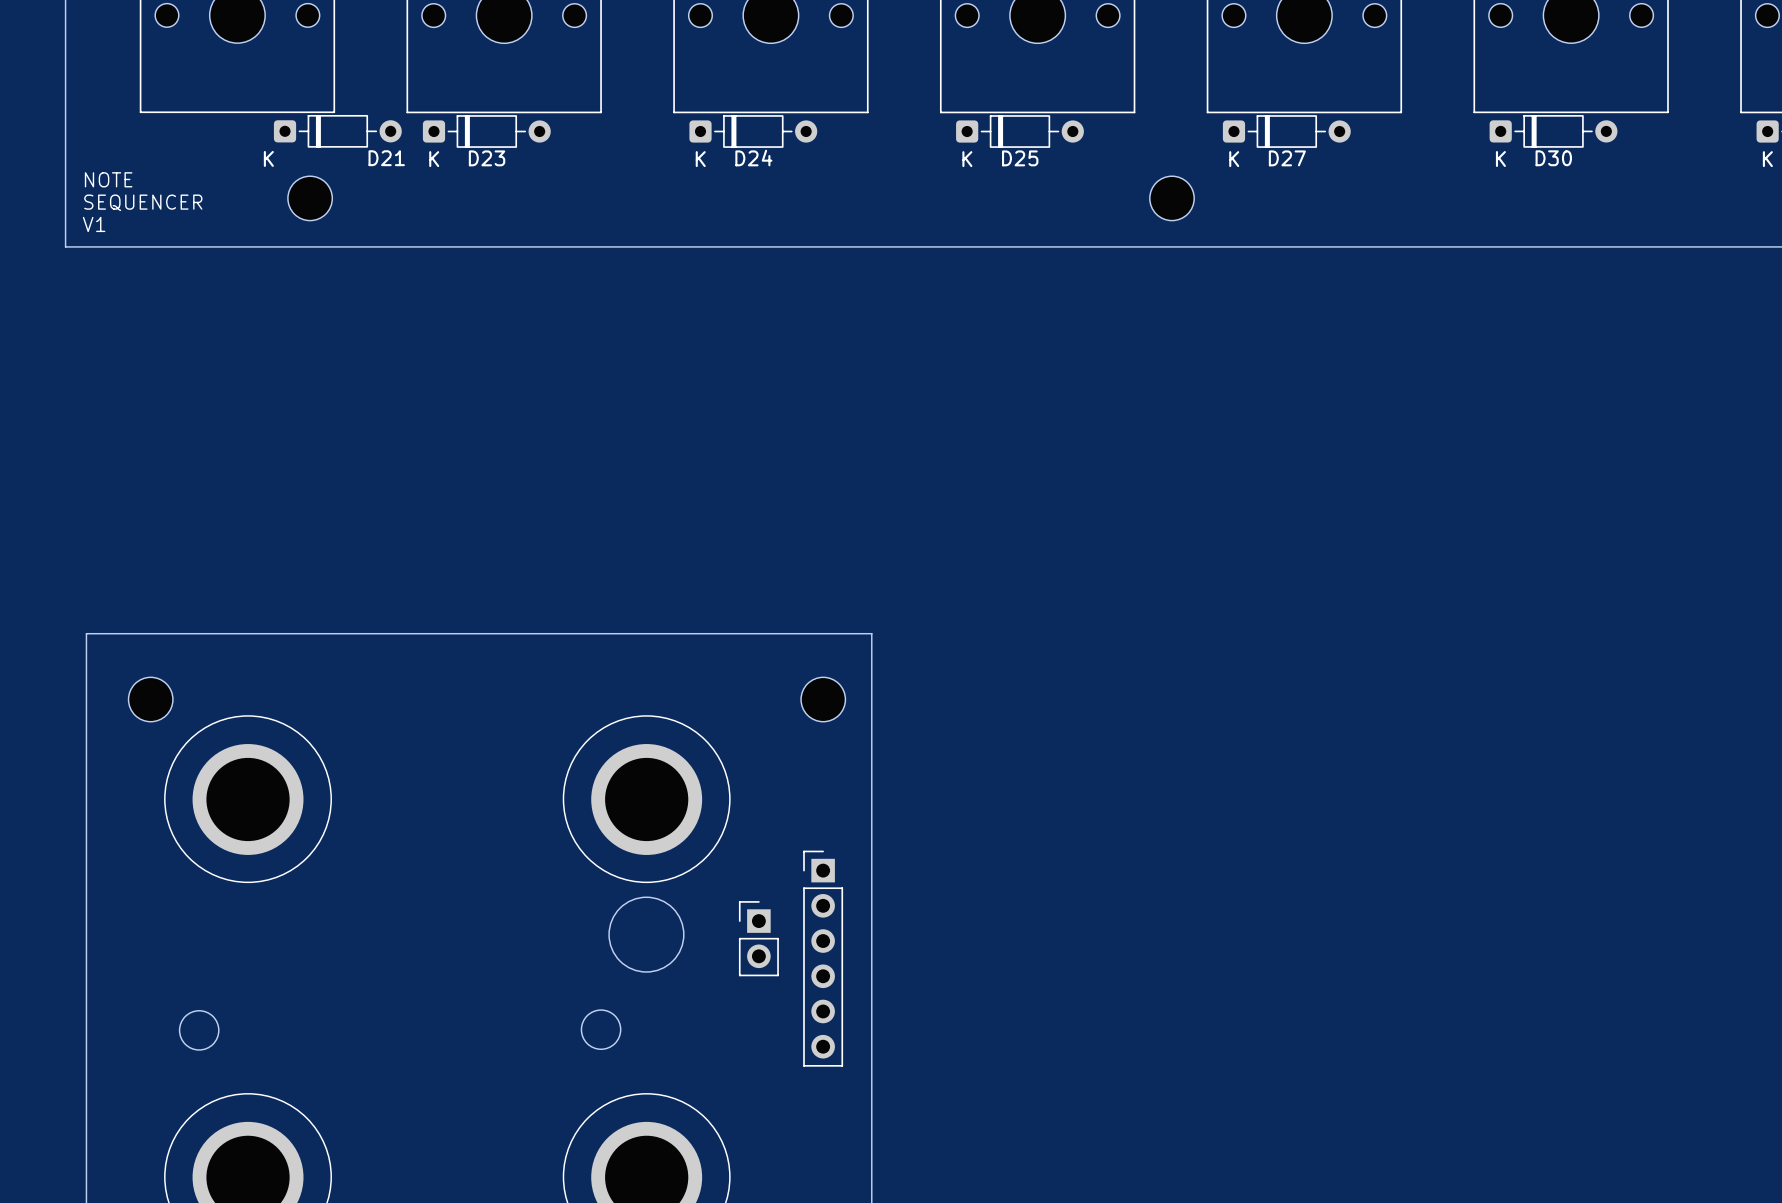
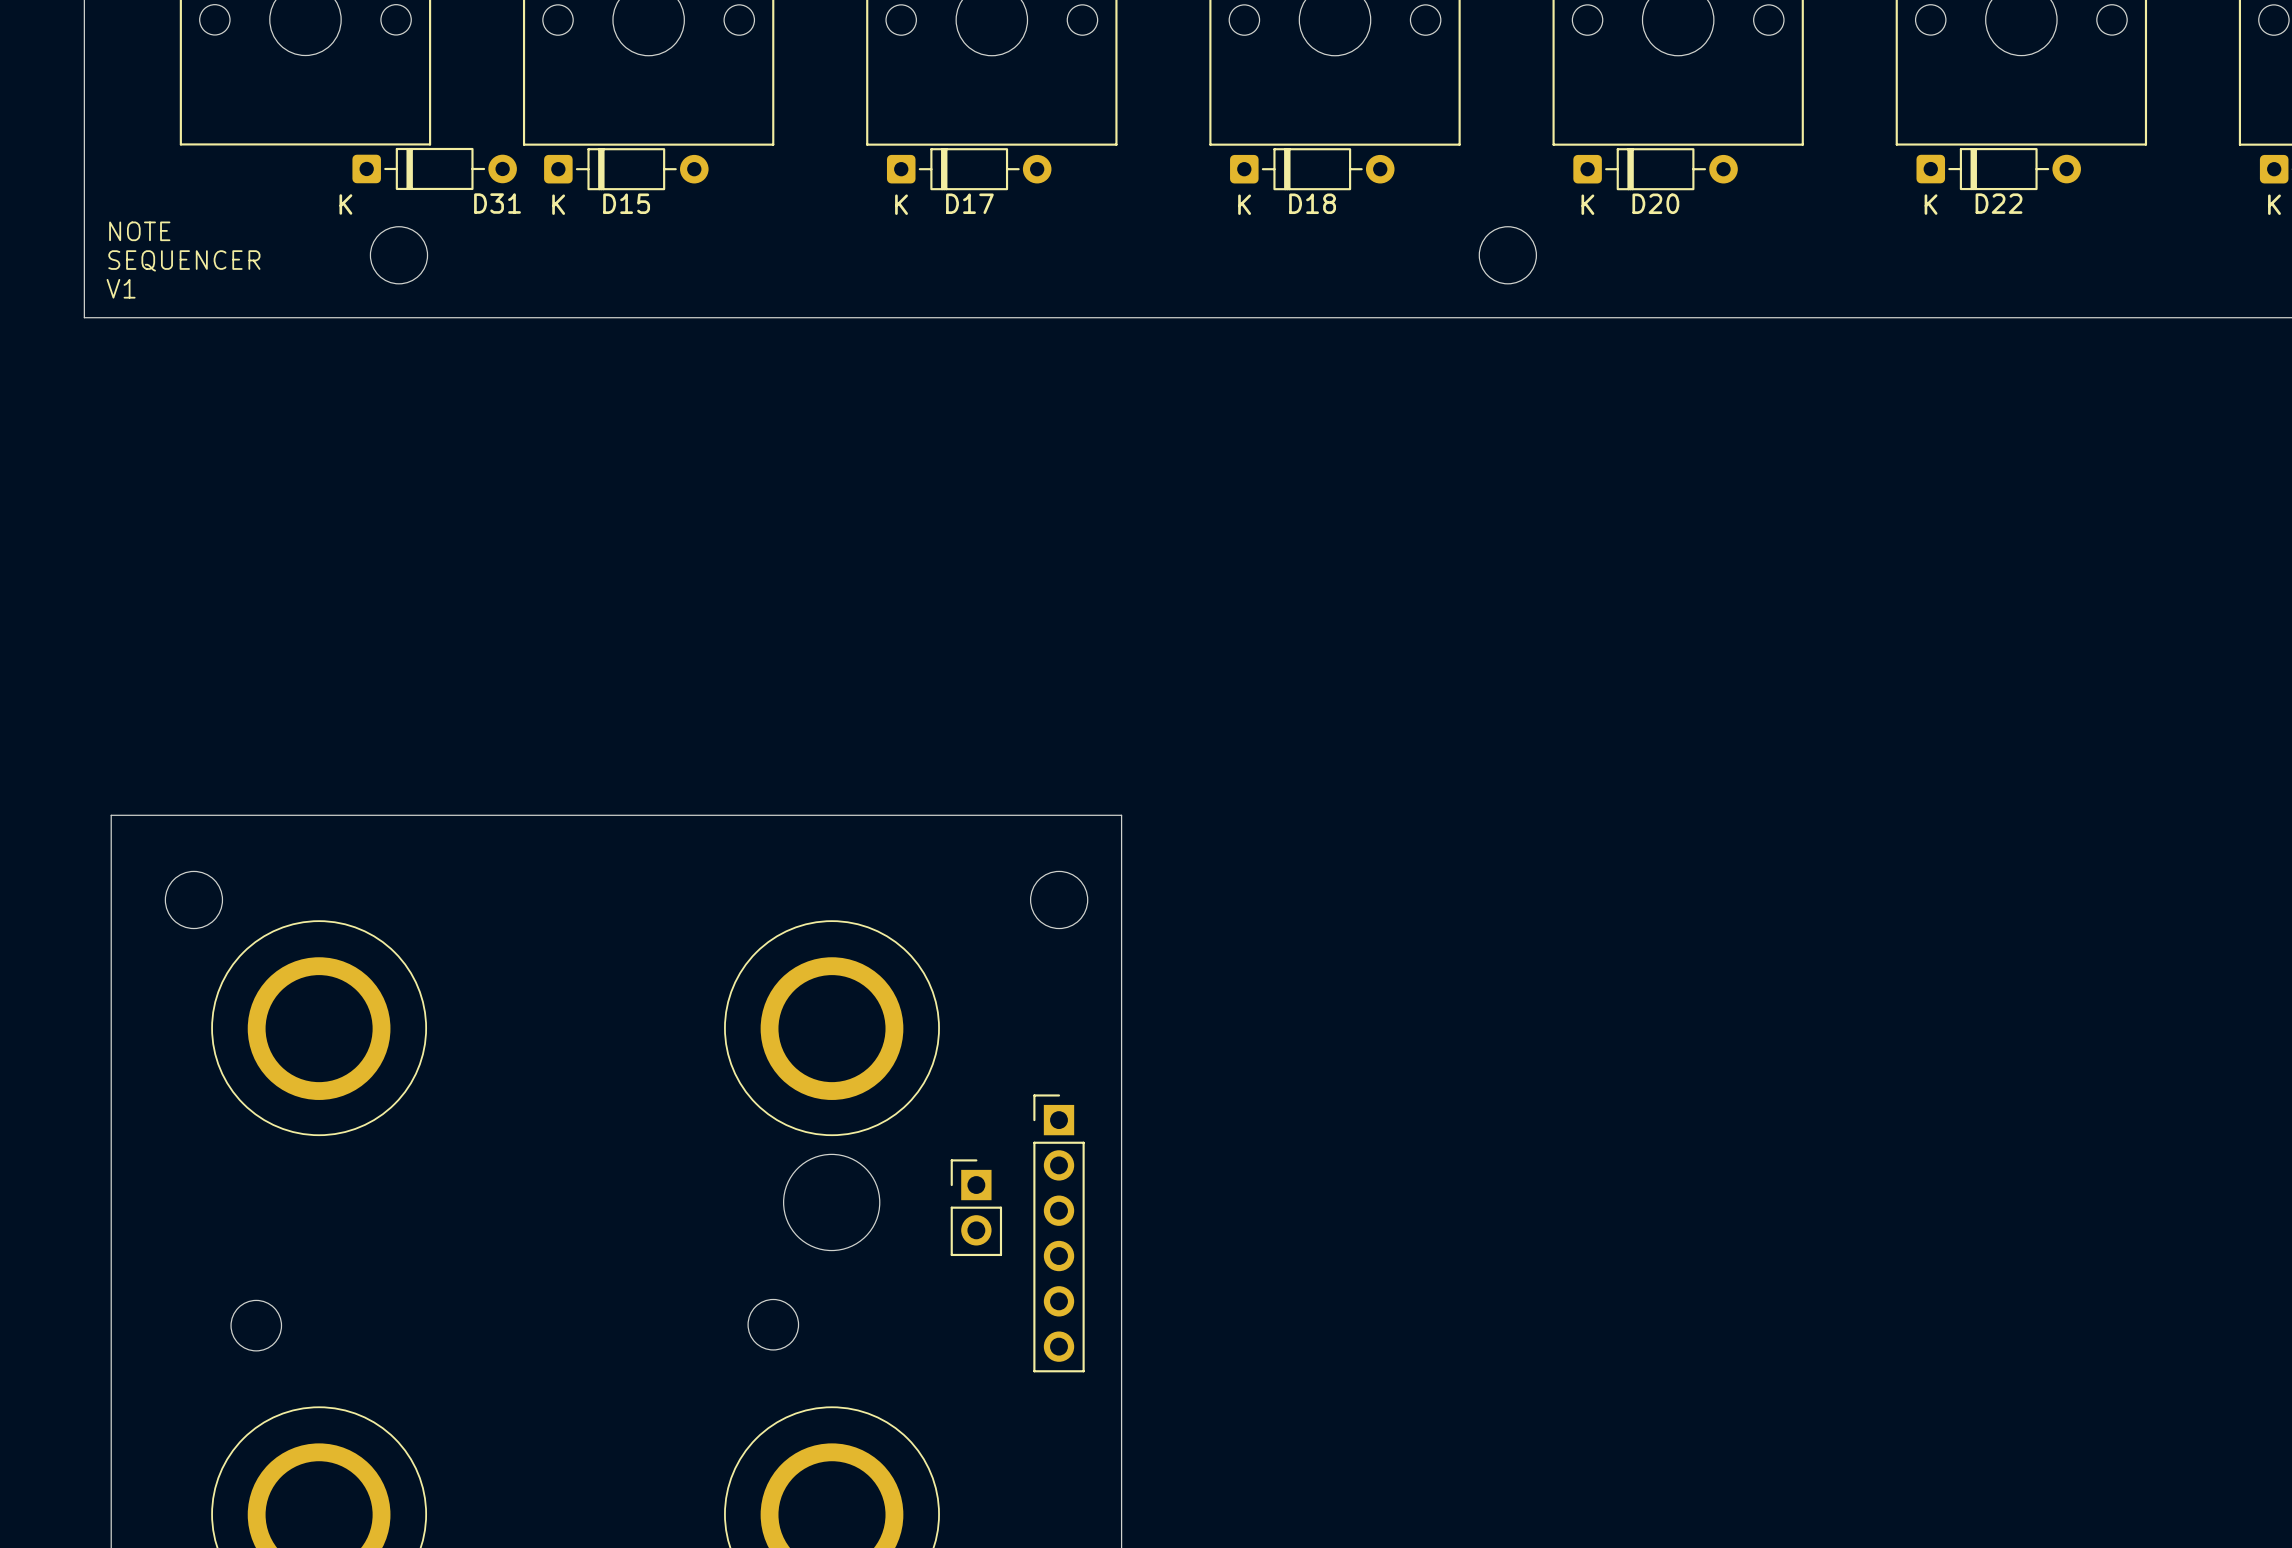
D21 name: D21 (386, 158) -> D31 (497, 203)
D23 name: D23 (487, 158) -> D15 (626, 203)
D24 name: D24 (753, 158) -> D17 (969, 203)
D25 name: D25 (1020, 158) -> D18 (1312, 203)
D27 name: D27 (1287, 158) -> D20 (1655, 203)
D30 name: D30 (1553, 158) -> D22 (1999, 203)

